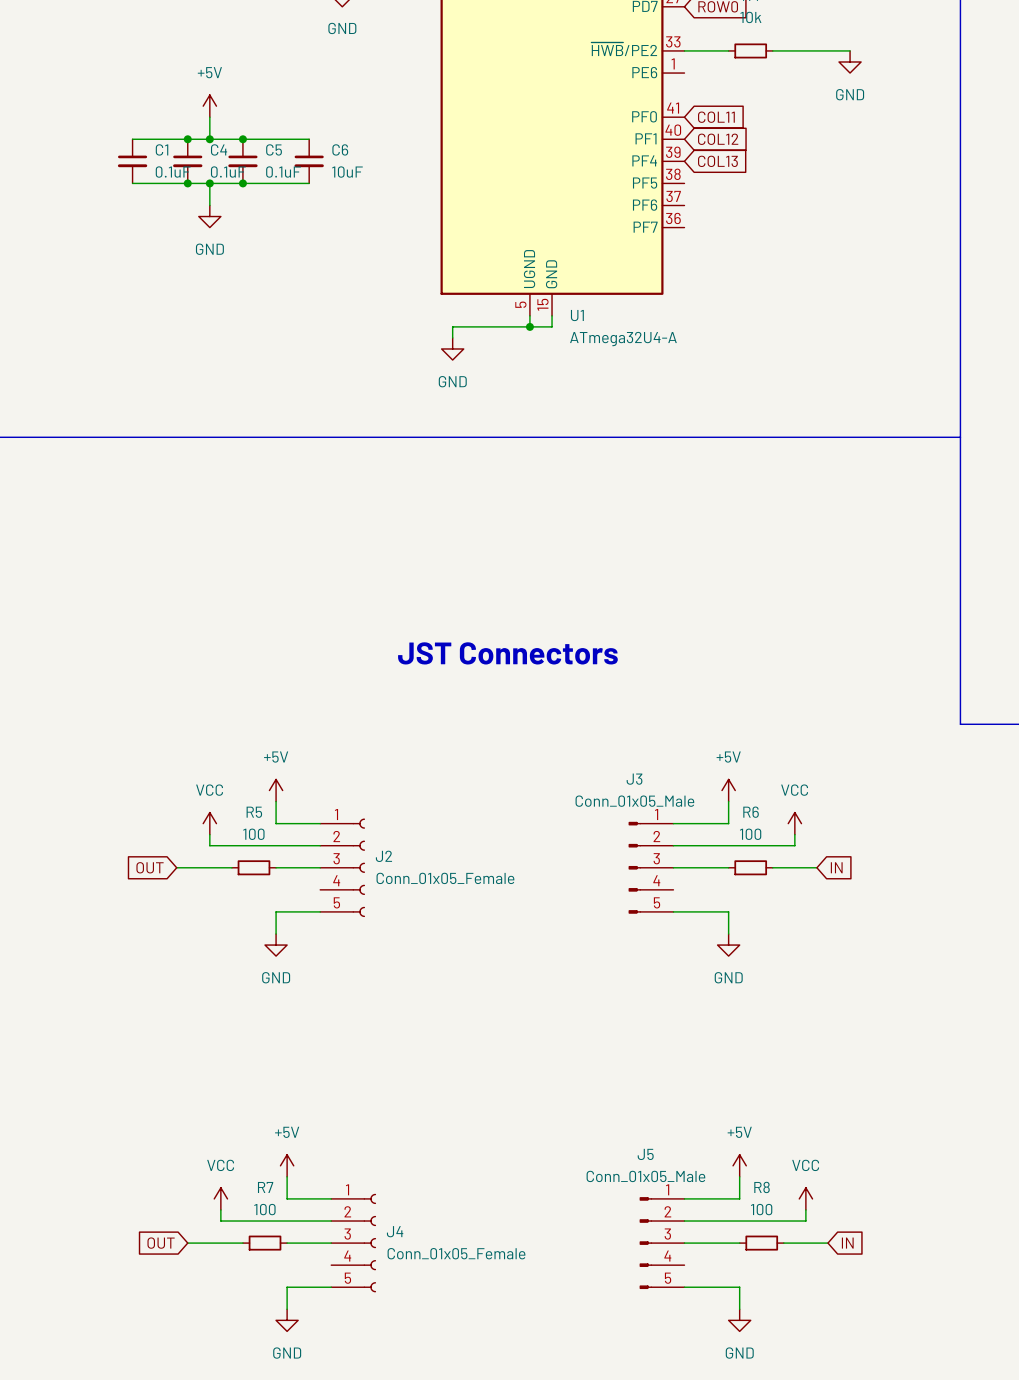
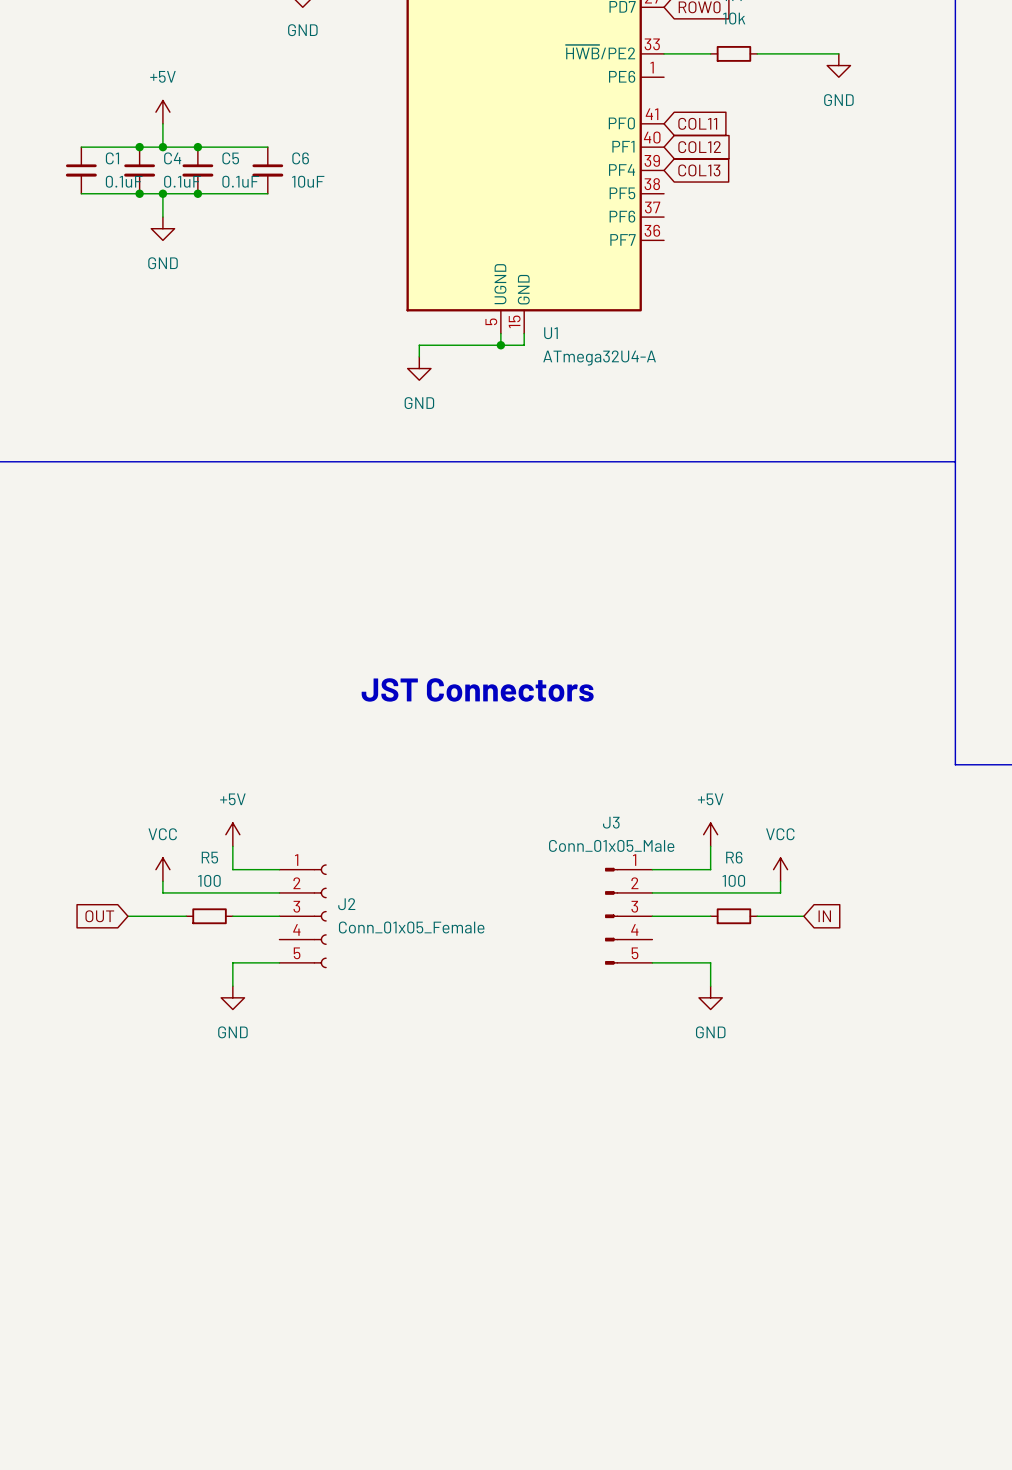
power symbol: +5V (287, 1165) -> none
power symbol: +5V (739, 1165) -> none
wire: (287, 1176) (287, 1198) (331, 1198) -> none
wire: (739, 1176) (739, 1198) (684, 1198) -> none
power symbol: VCC (220, 1198) -> none
power symbol: VCC (805, 1198) -> none
wire: (220, 1209) (220, 1221) (331, 1221) -> none
wire: (805, 1209) (805, 1221) (684, 1221) -> none
global label: OUT (161, 1243) -> none
wire: (187, 1243) (242, 1243) -> none
R7: 100 (265, 1243) -> none
wire: (287, 1243) (331, 1243) -> none
J4: Conn_01x05_Female (353, 1243) -> none
J5: Conn_01x05_Male (662, 1243) -> none
wire: (684, 1243) (739, 1243) -> none
R8: 100 (761, 1243) -> none
wire: (783, 1243) (827, 1243) -> none
global label: IN (847, 1243) -> none
wire: (331, 1287) (287, 1287) (287, 1309) -> none
wire: (684, 1287) (739, 1287) (739, 1309) -> none
power symbol: GND (287, 1320) -> none
power symbol: GND (739, 1320) -> none

